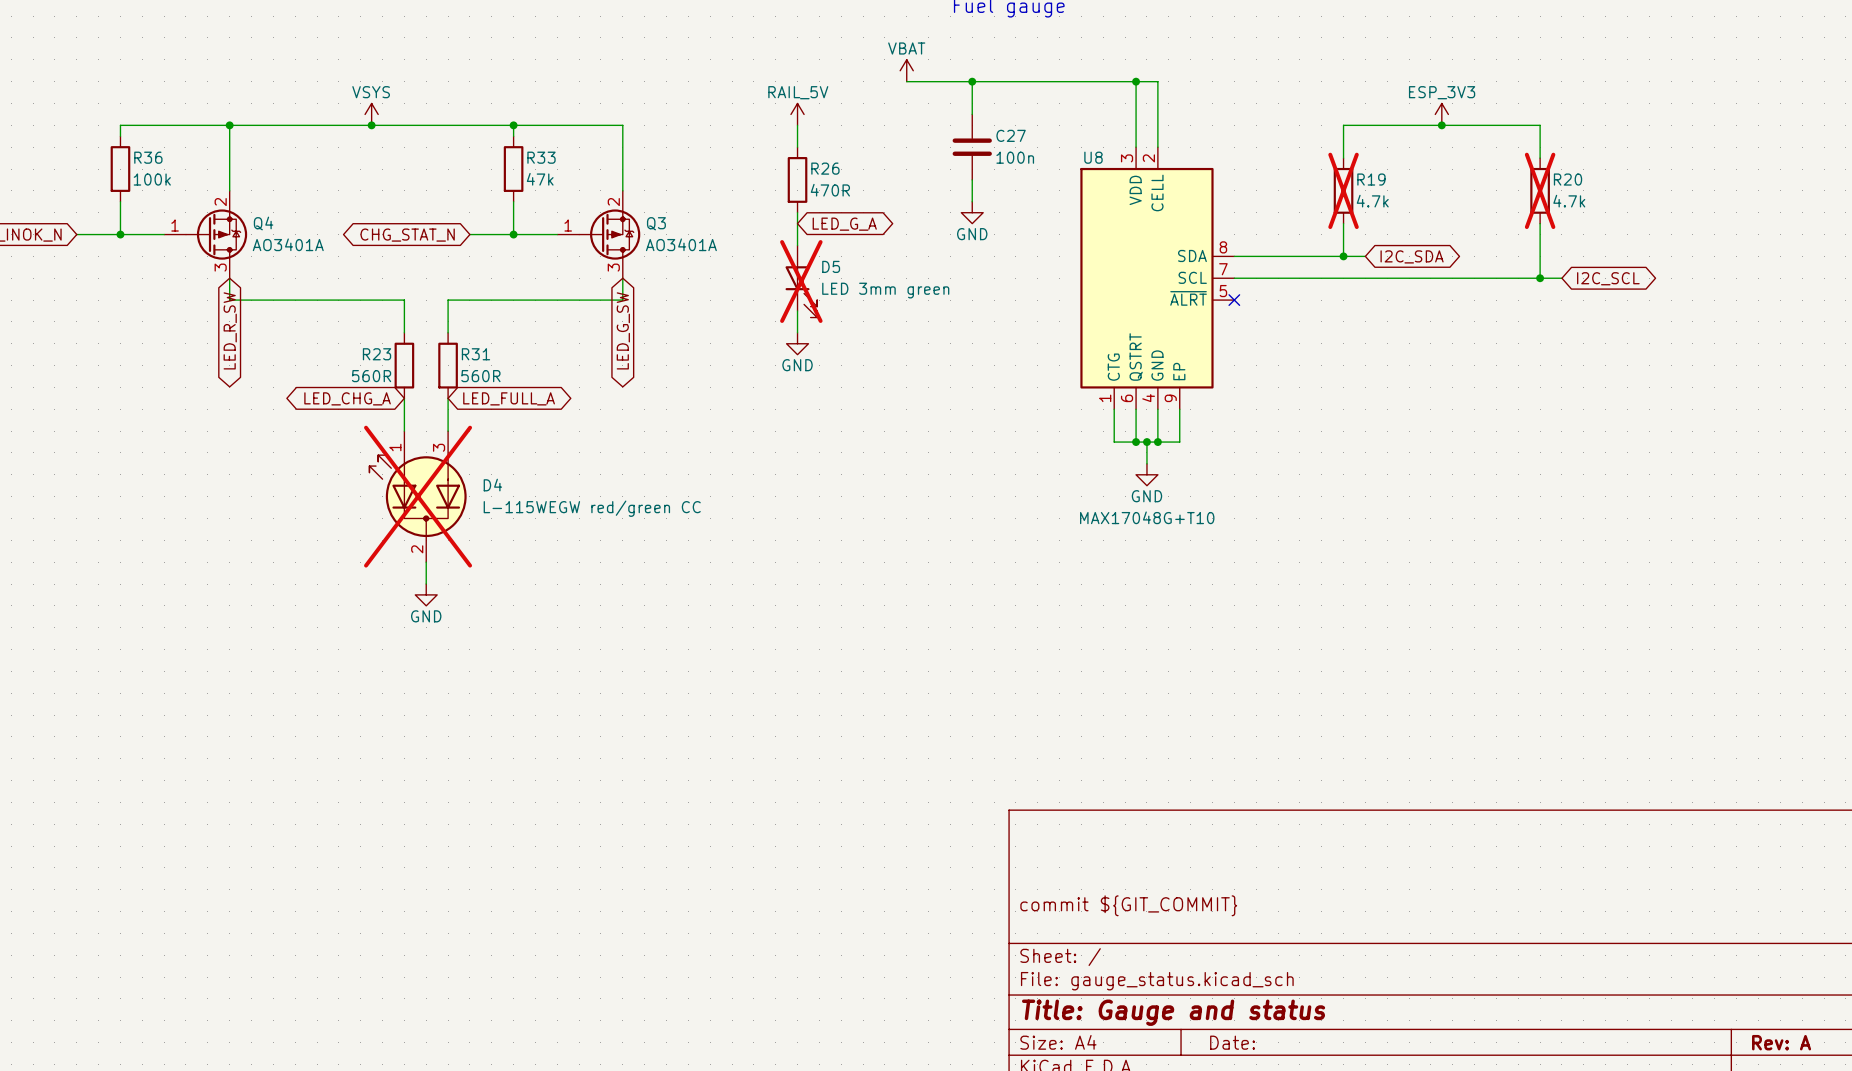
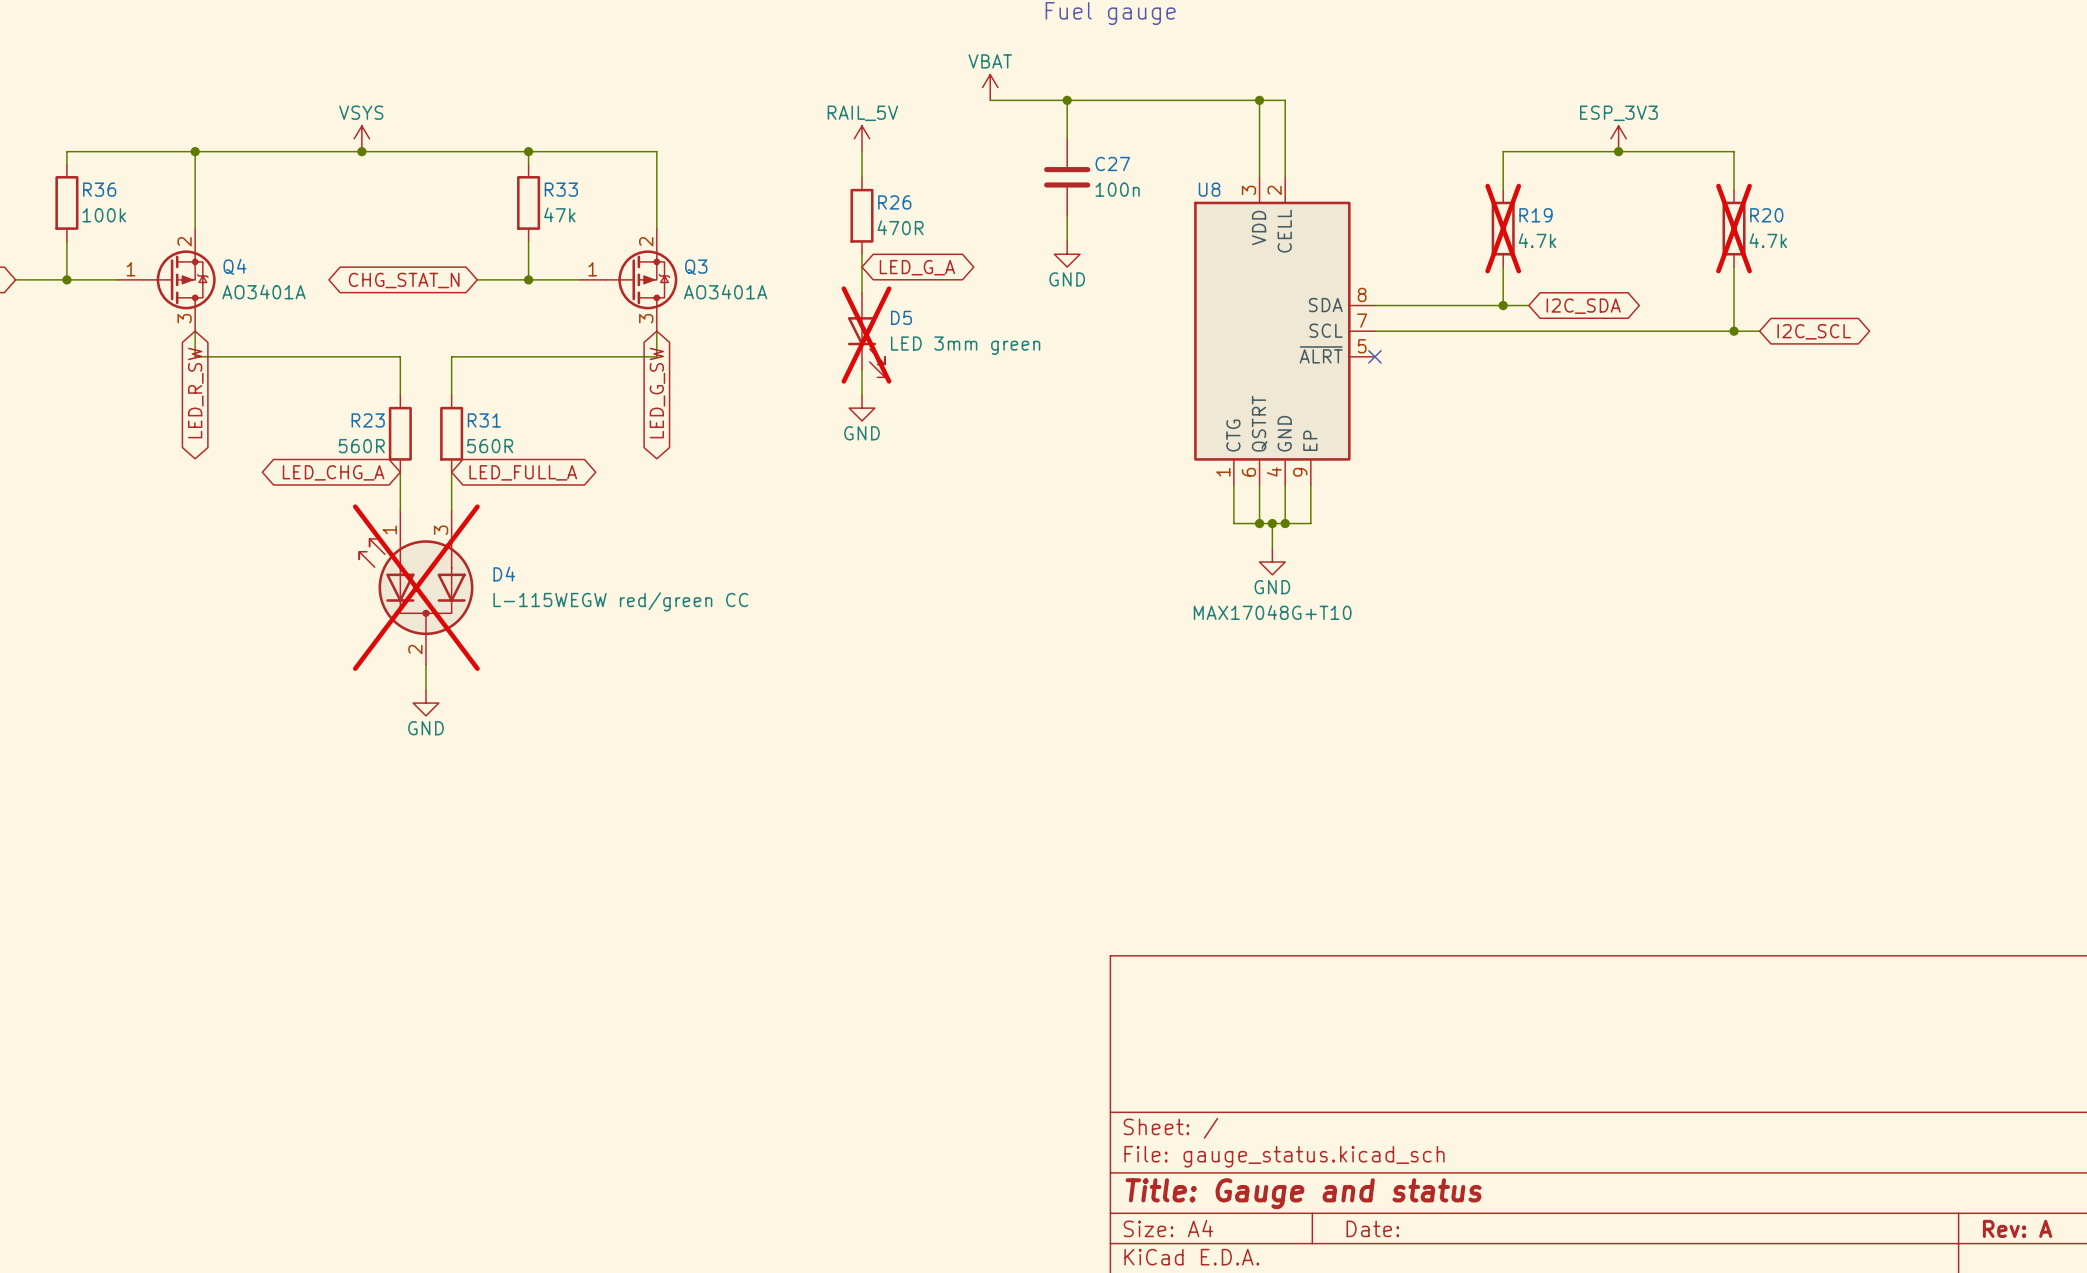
title block: commit ${GIT_COMMIT} (1128, 905) -> none

